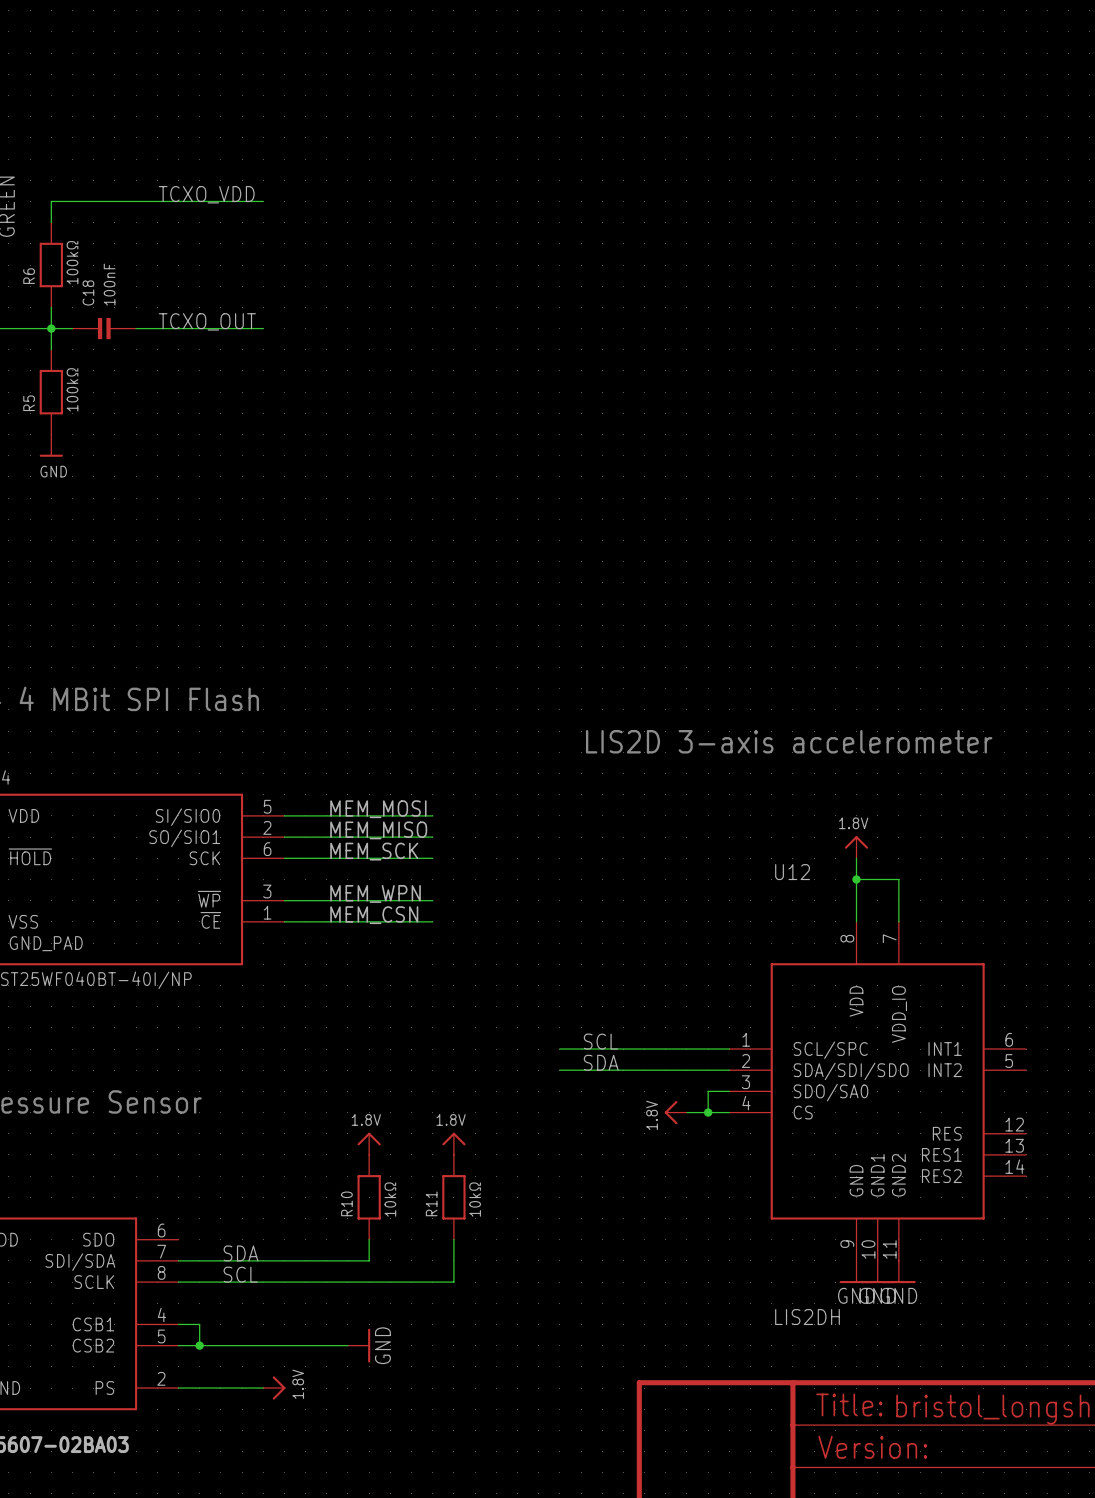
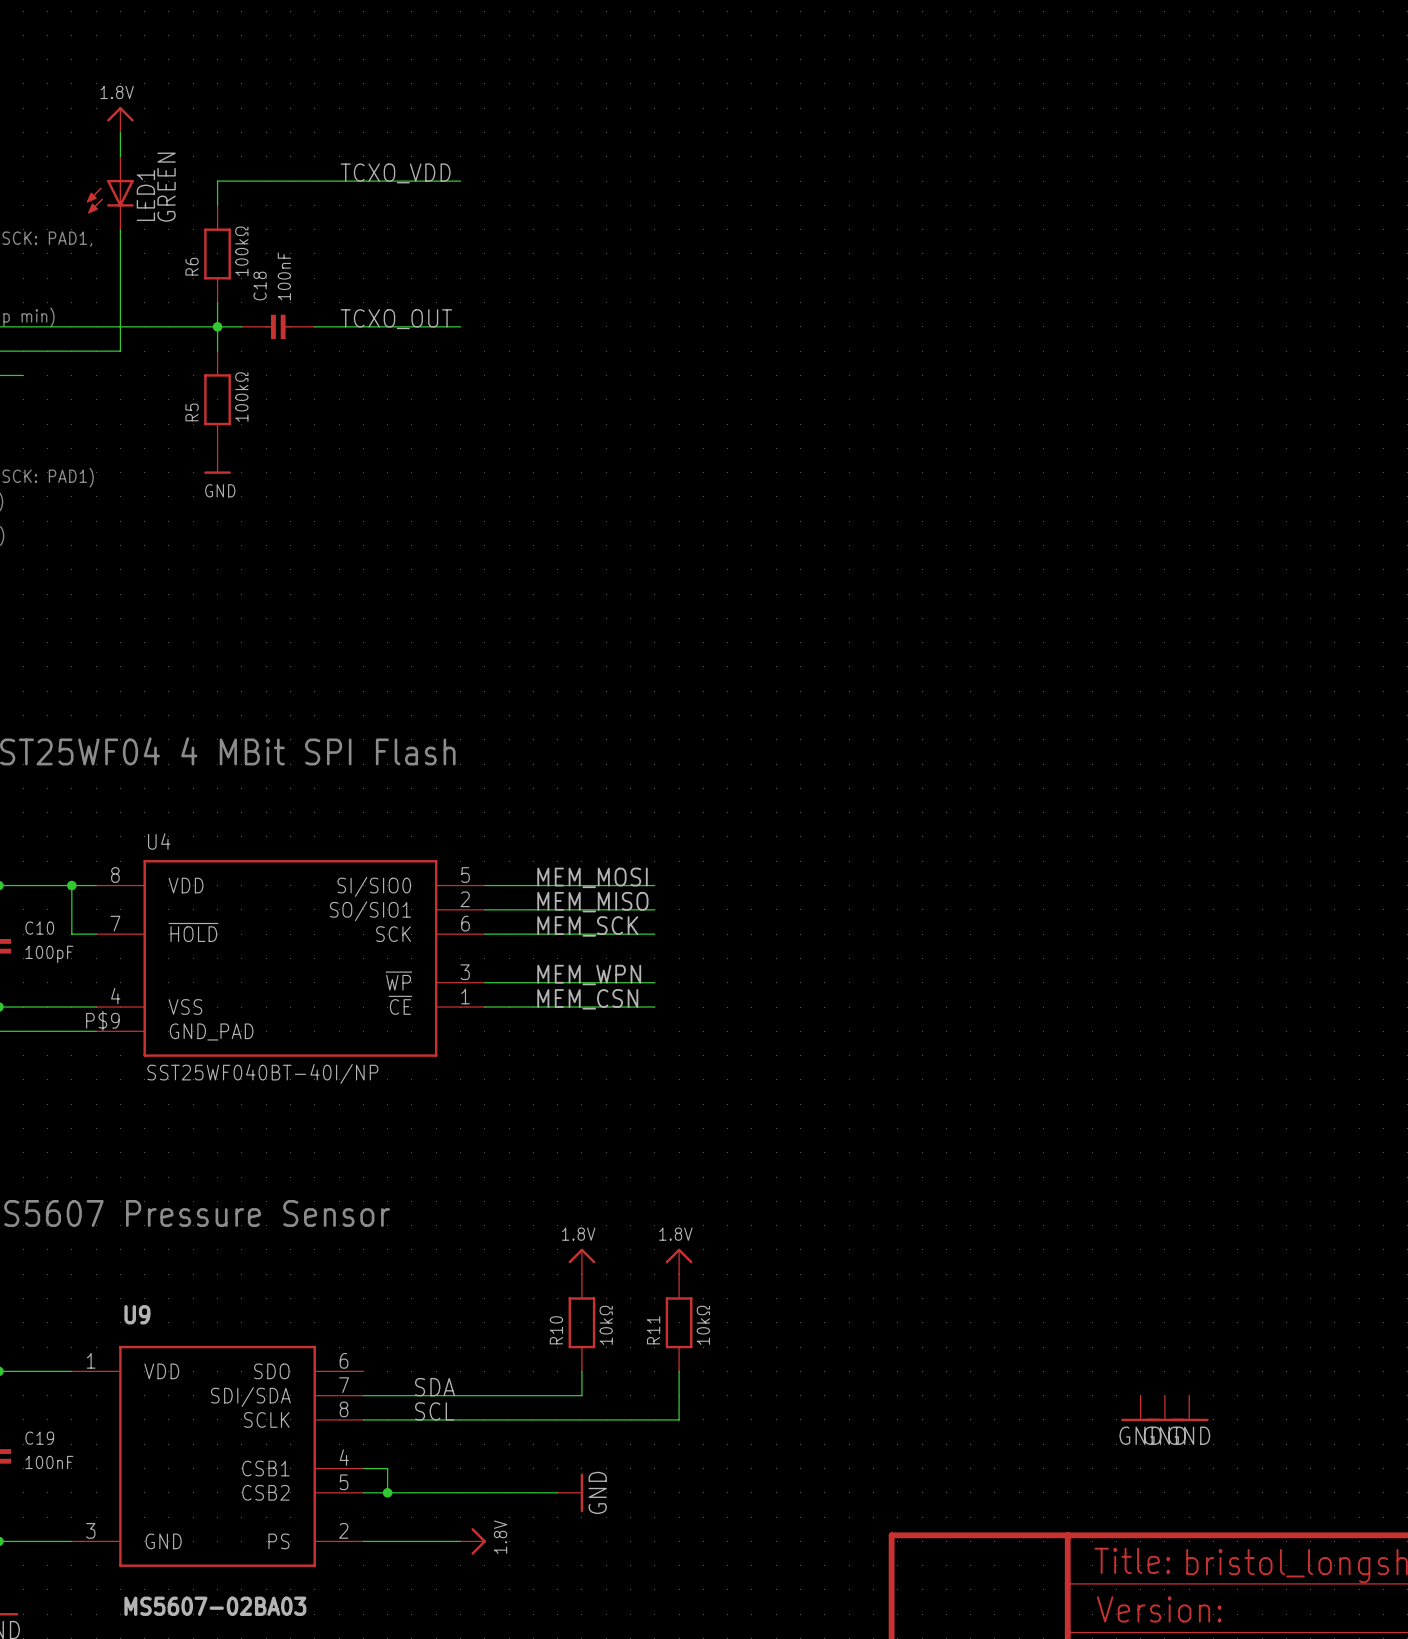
text: LIS2D 3-axis accelerometer (789, 741) -> none
power symbol: 1.8V (856, 847) -> none
wire: (856, 858) (856, 921) -> none
wire: (856, 879) (898, 879) (898, 921) -> none
junction: (856, 879) -> none
label: SCL (600, 1041) -> none
wire: (559, 1049) (729, 1049) -> none
label: SDA (601, 1062) -> none
wire: (559, 1070) (729, 1070) -> none
wire: (729, 1091) (708, 1091) (708, 1112) -> none
U12: LIS2DH (877, 1091) -> none
power symbol: 1.8V (675, 1112) -> none
wire: (686, 1112) (729, 1112) -> none
junction: (708, 1112) -> none

